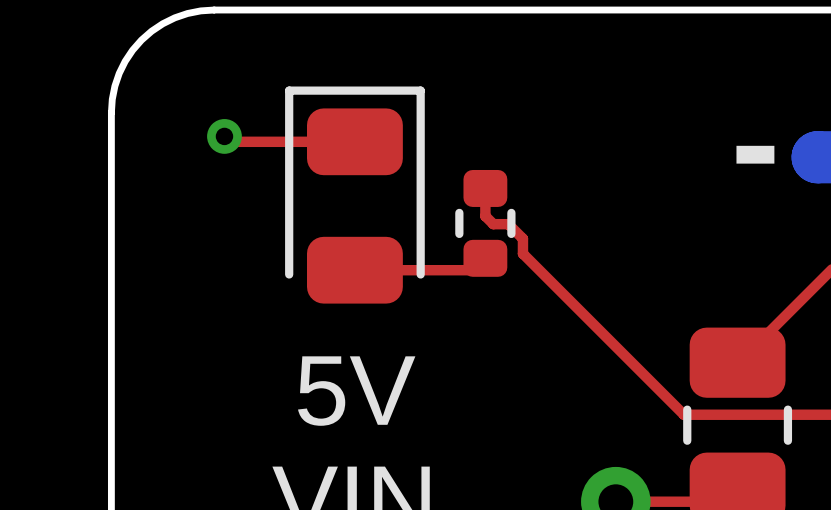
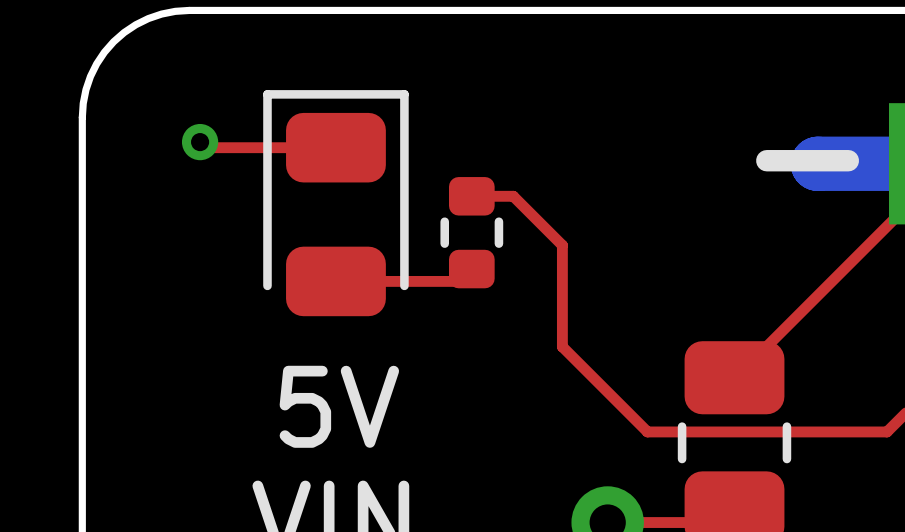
top track: (485, 188) (485, 216) (493, 224) (508, 224) (522, 238) (522, 253) (683, 414) -> (471, 196) (513, 196) (562, 245) (562, 346) (647, 431) (678, 431)

